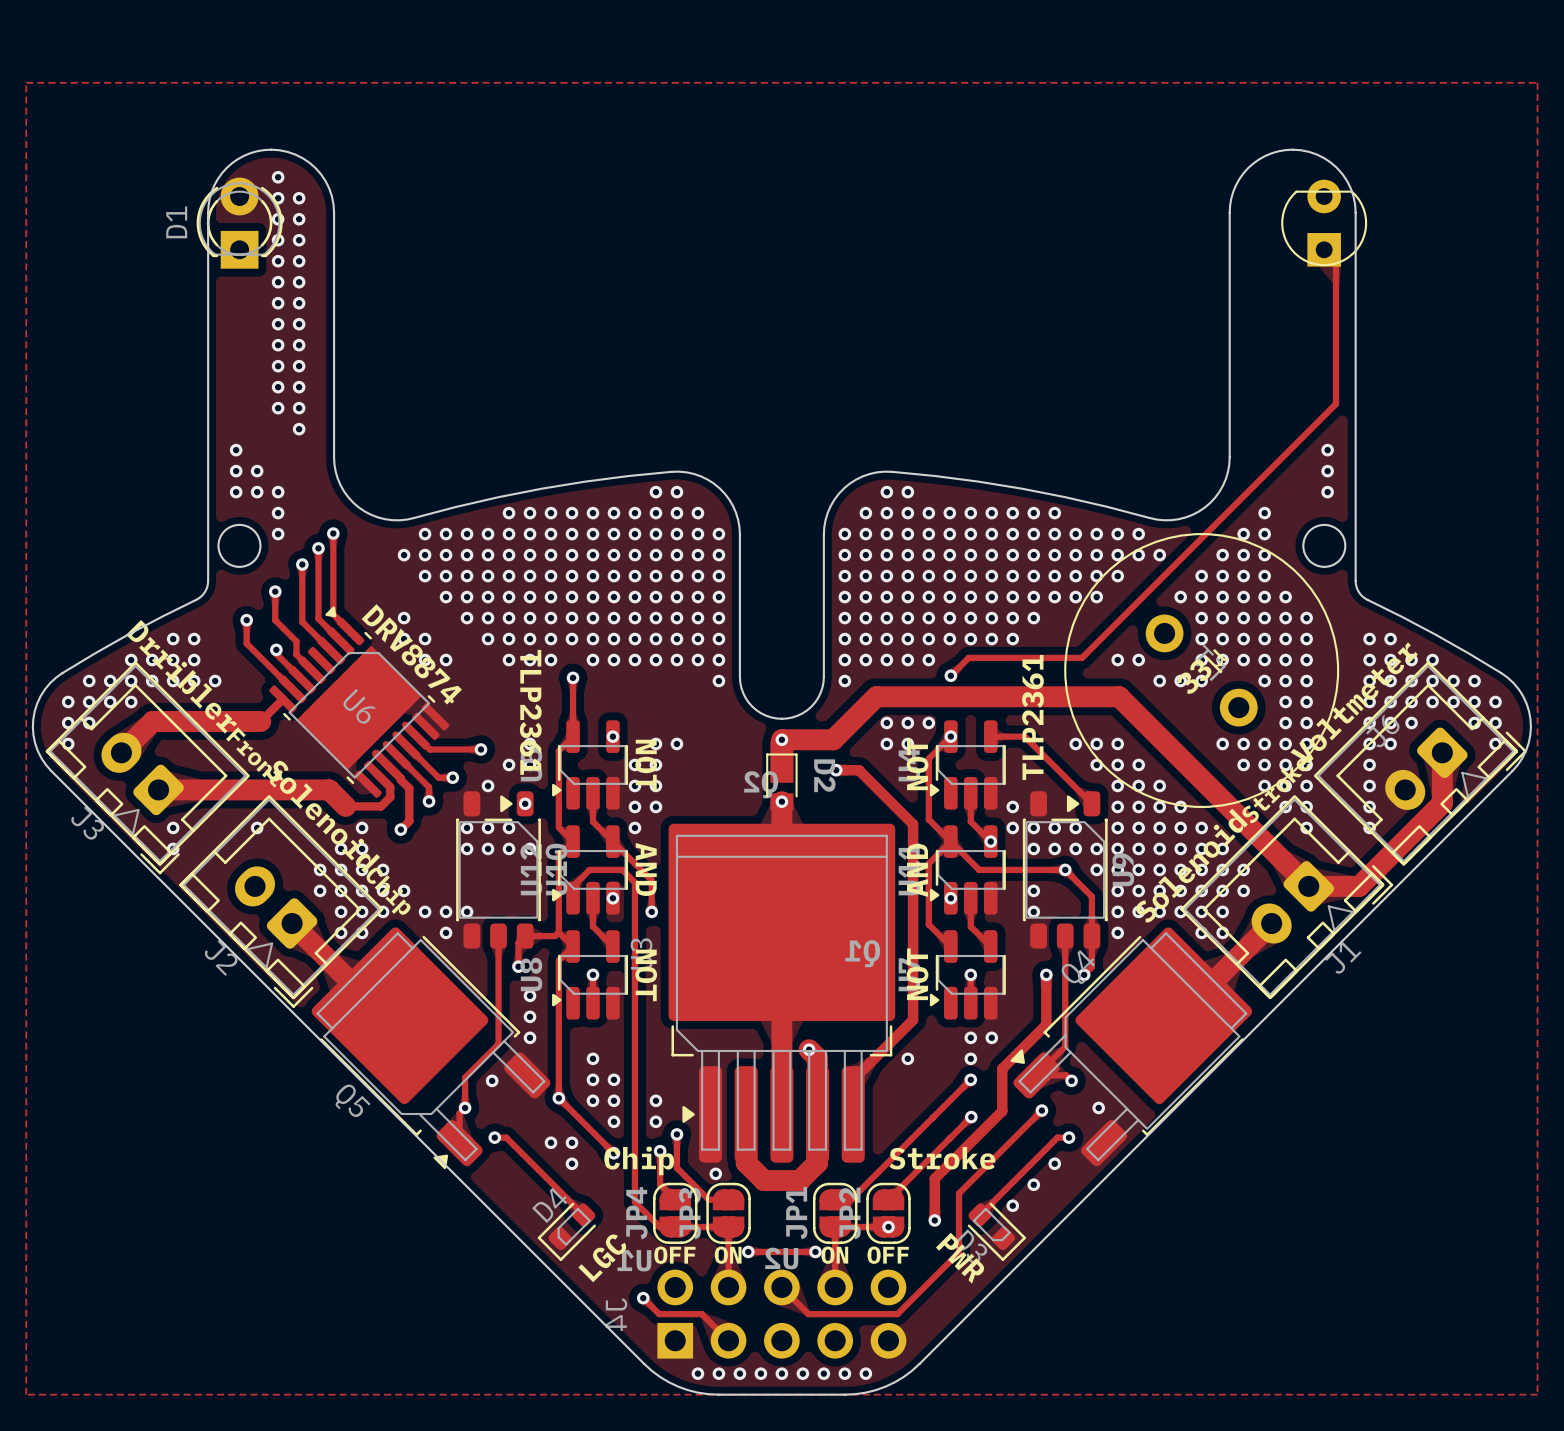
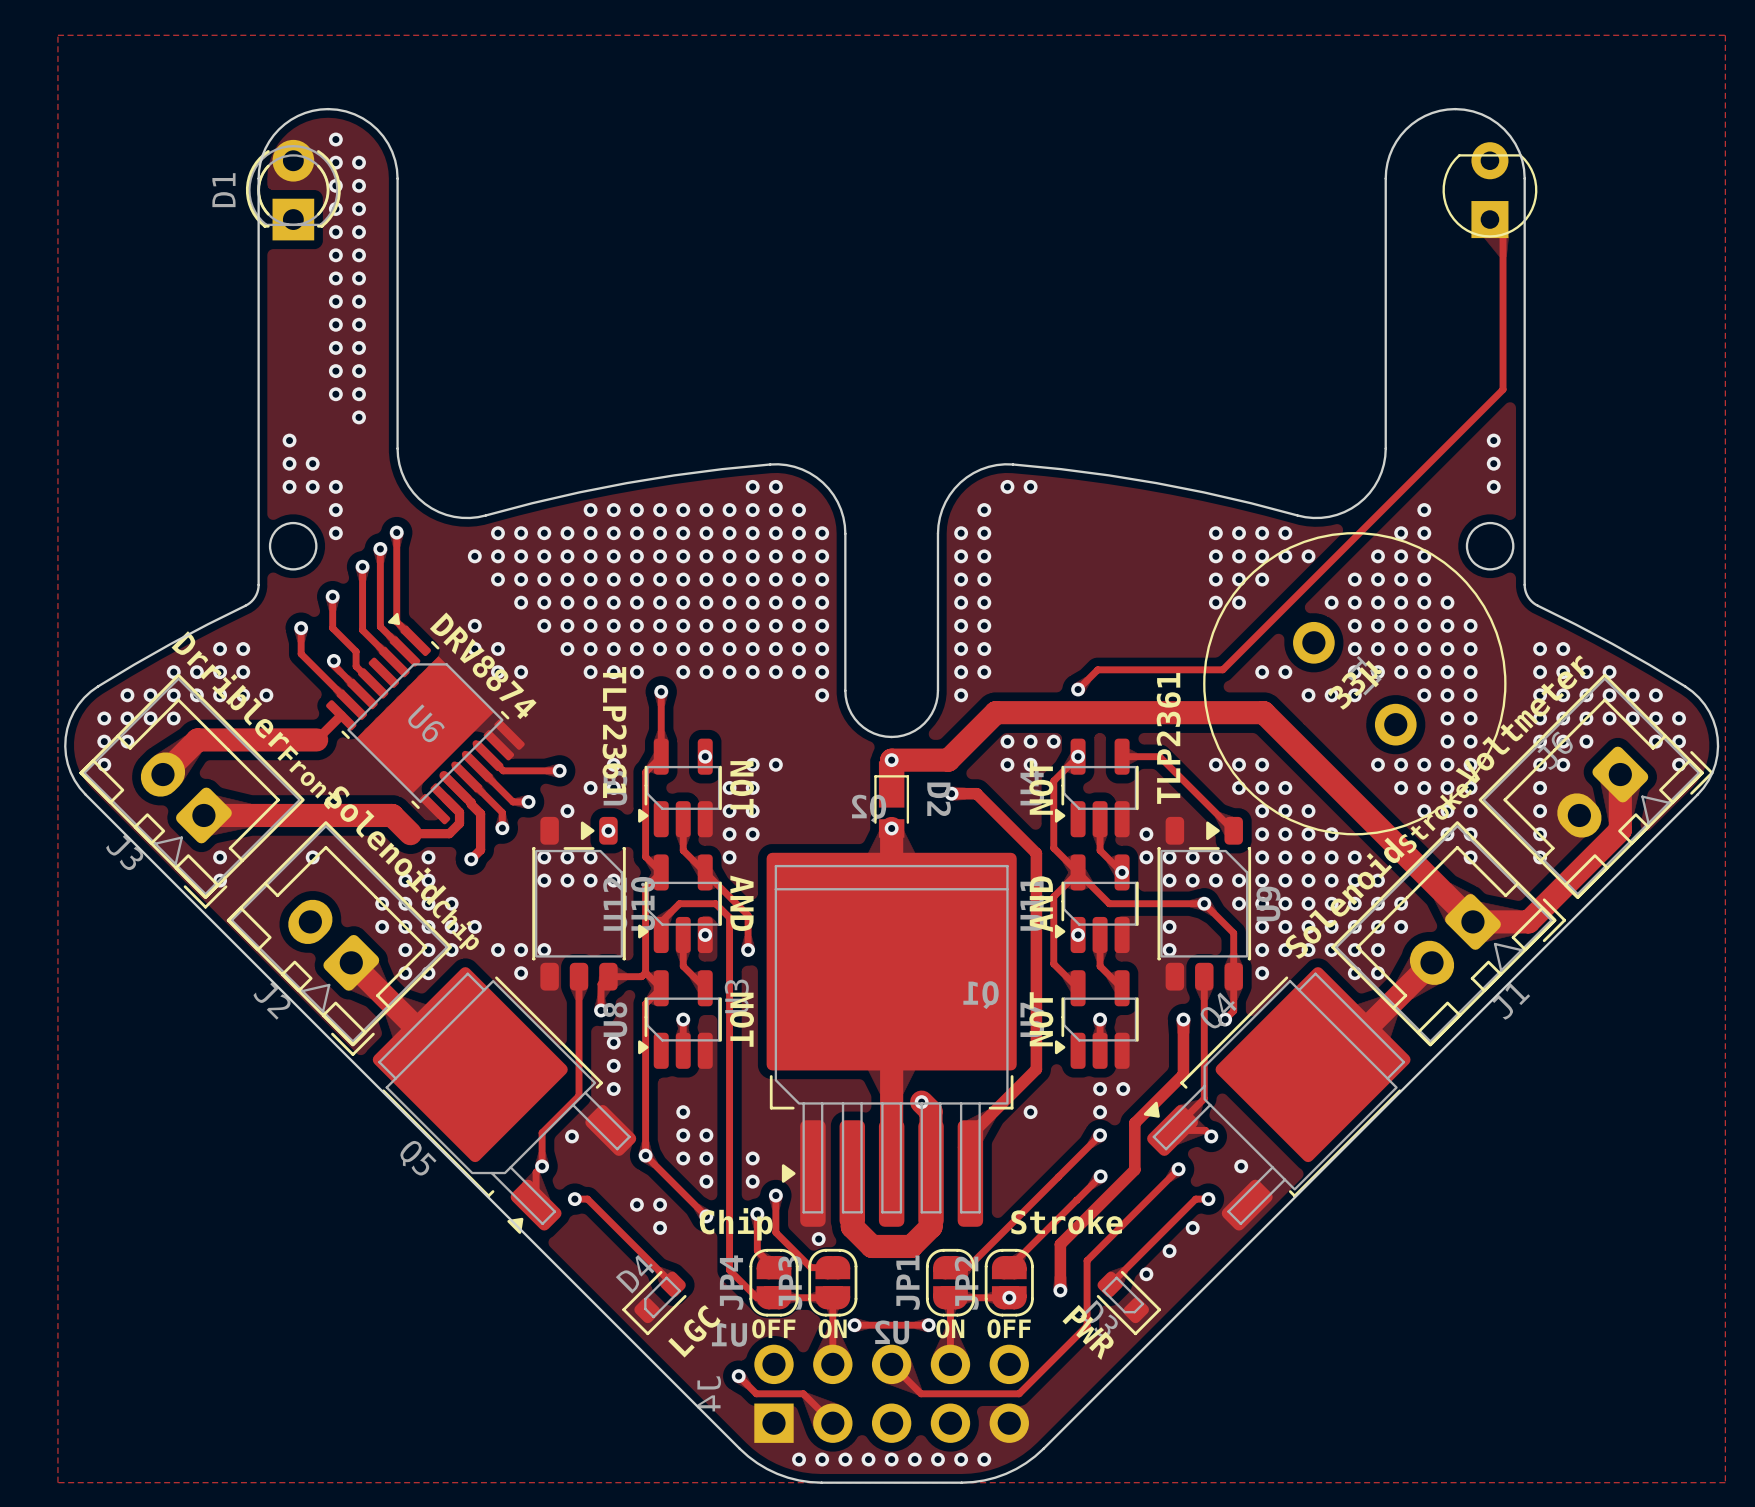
via: (886, 513) -> none
via: (907, 513) -> none
via: (928, 513) -> none
via: (949, 513) -> none
via: (970, 513) -> none
via: (991, 513) -> none
via: (1012, 513) -> none
via: (1033, 513) -> none
via: (1054, 513) -> none
via: (886, 534) -> none
via: (907, 534) -> none
via: (928, 534) -> none
via: (949, 534) -> none
via: (970, 534) -> none
via: (991, 534) -> none
via: (1012, 534) -> none
via: (1033, 534) -> none
via: (1054, 534) -> none
via: (886, 555) -> none
via: (907, 555) -> none
via: (928, 555) -> none
via: (949, 555) -> none
via: (970, 555) -> none
via: (991, 555) -> none
via: (1012, 555) -> none
via: (1033, 555) -> none
via: (1054, 555) -> none
via: (886, 576) -> none
via: (907, 576) -> none
via: (928, 576) -> none
via: (949, 576) -> none
via: (970, 576) -> none
via: (991, 576) -> none
via: (1012, 576) -> none
via: (1033, 576) -> none
via: (1054, 576) -> none
via: (886, 597) -> none
via: (907, 597) -> none
via: (928, 597) -> none
via: (949, 597) -> none
via: (970, 597) -> none
via: (991, 597) -> none
via: (1012, 597) -> none
via: (1033, 597) -> none
via: (1054, 597) -> none
via: (886, 618) -> none
via: (907, 618) -> none
via: (928, 618) -> none
via: (949, 618) -> none
via: (970, 618) -> none
via: (991, 618) -> none
via: (1012, 618) -> none
via: (1033, 618) -> none
via: (886, 639) -> none
via: (907, 639) -> none
via: (928, 639) -> none
via: (949, 639) -> none
via: (970, 639) -> none
via: (991, 639) -> none
via: (1012, 639) -> none
via: (886, 660) -> none
via: (907, 660) -> none
via: (928, 660) -> none

